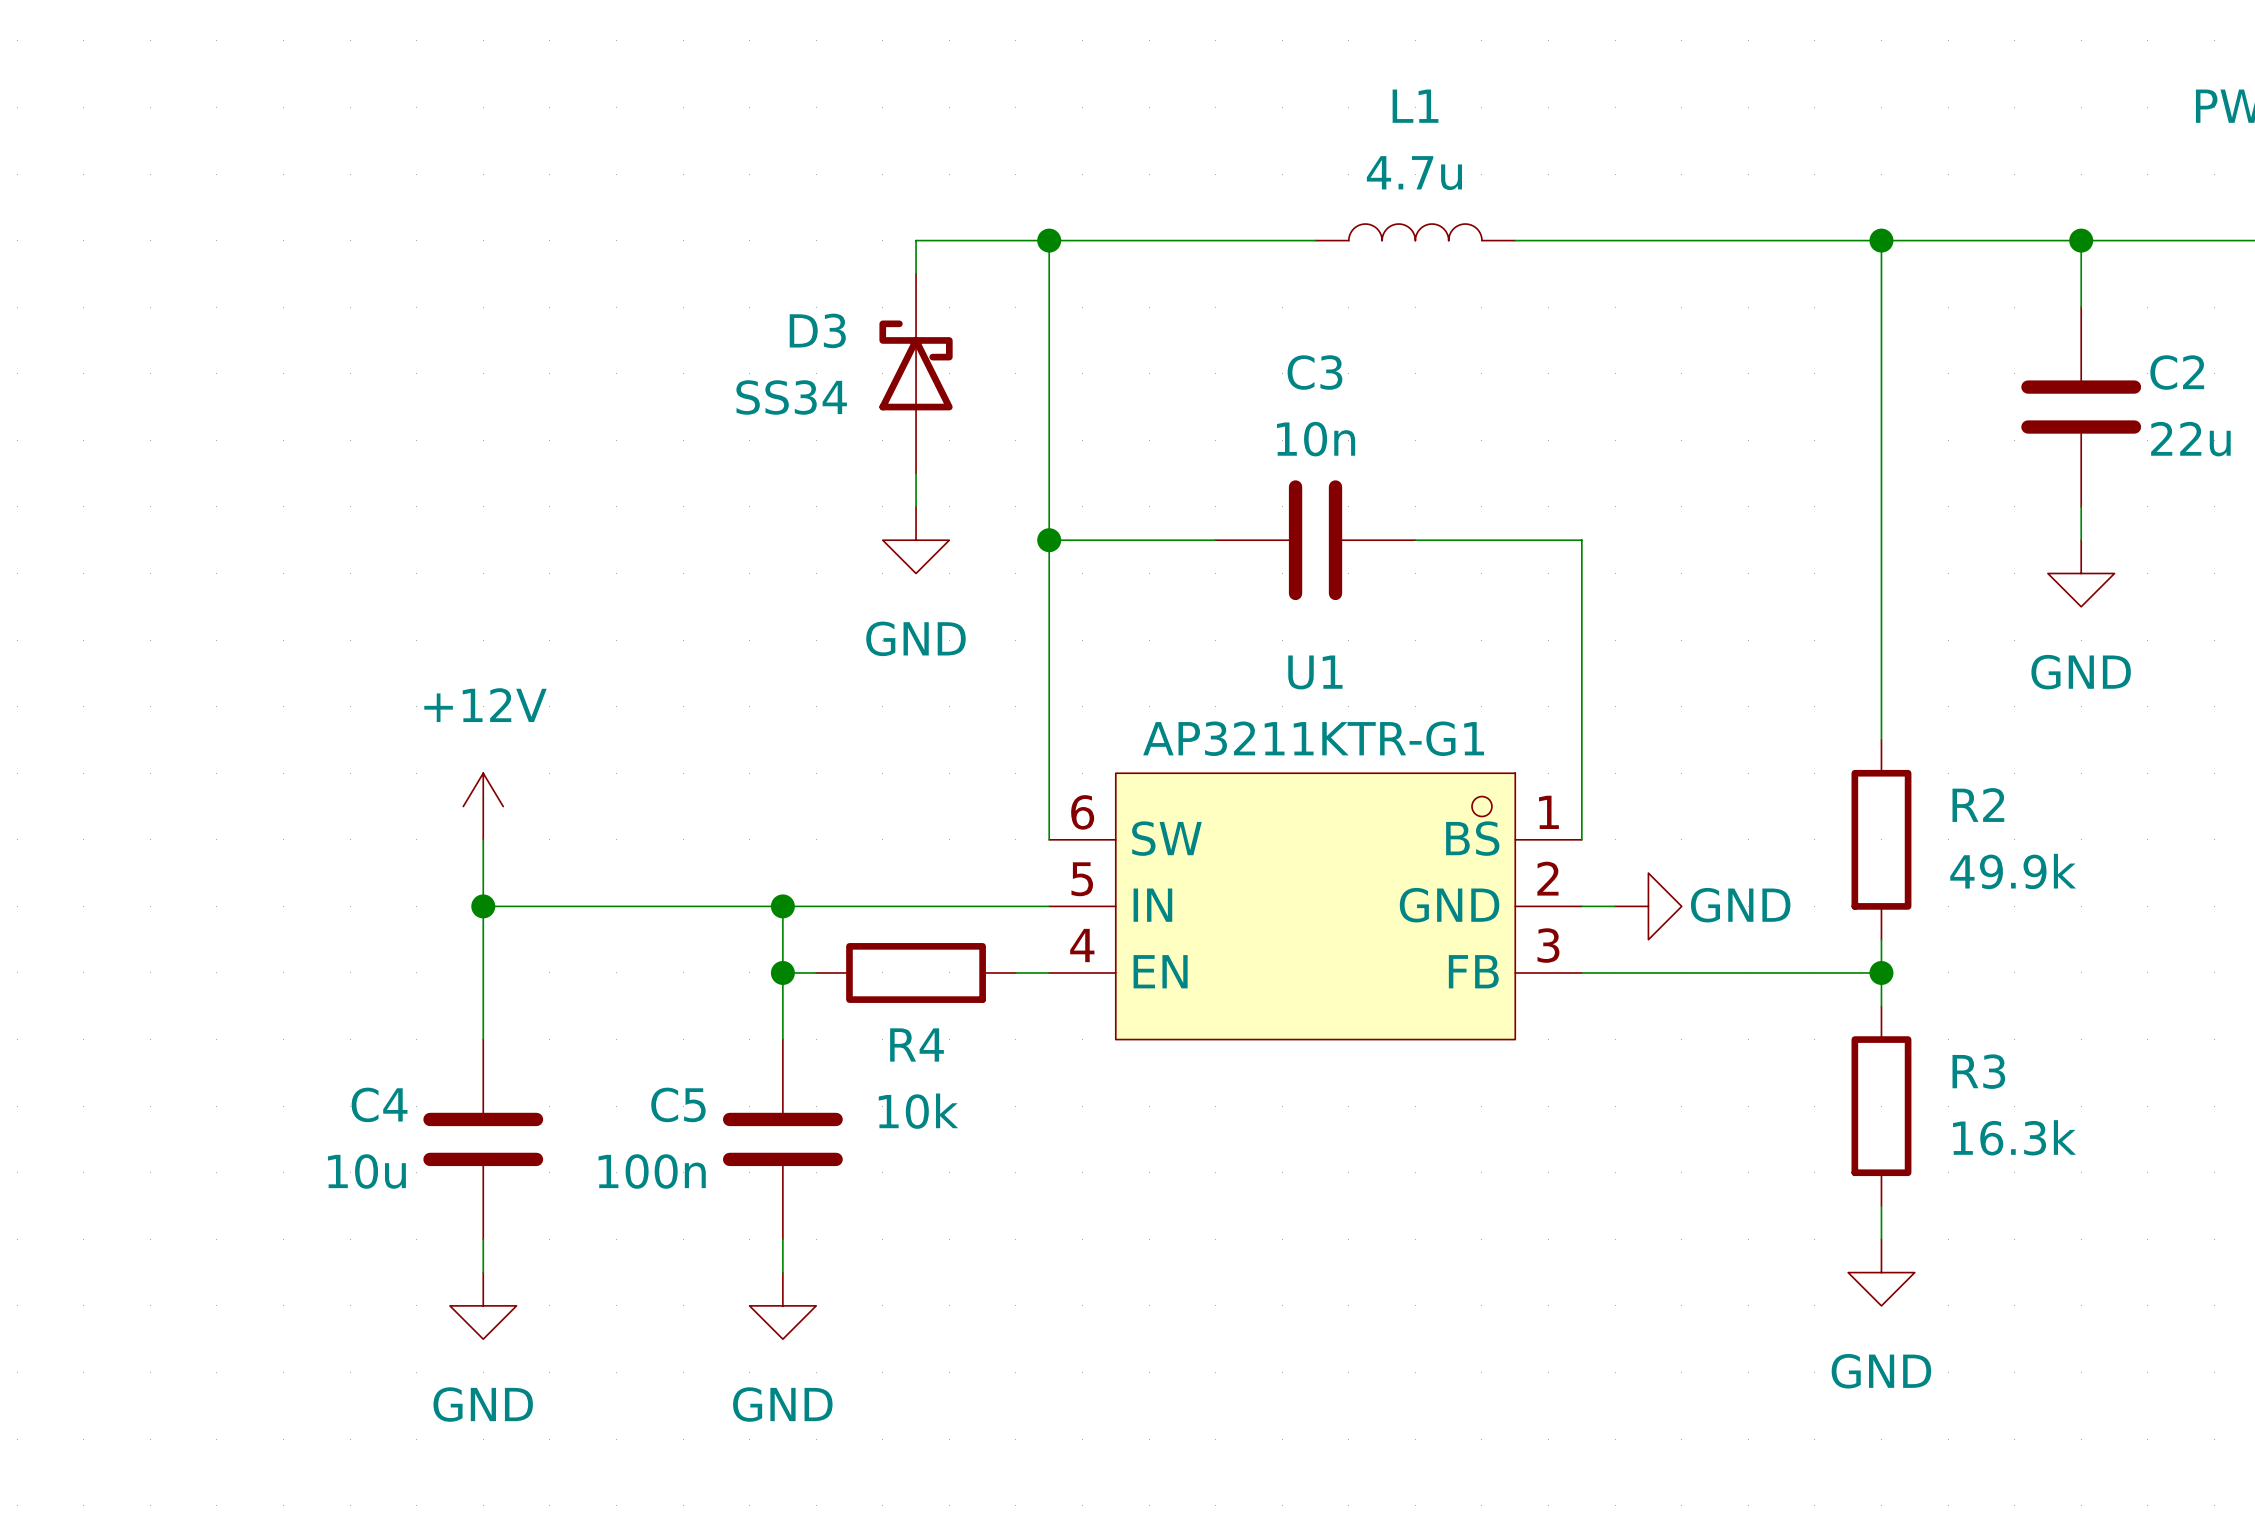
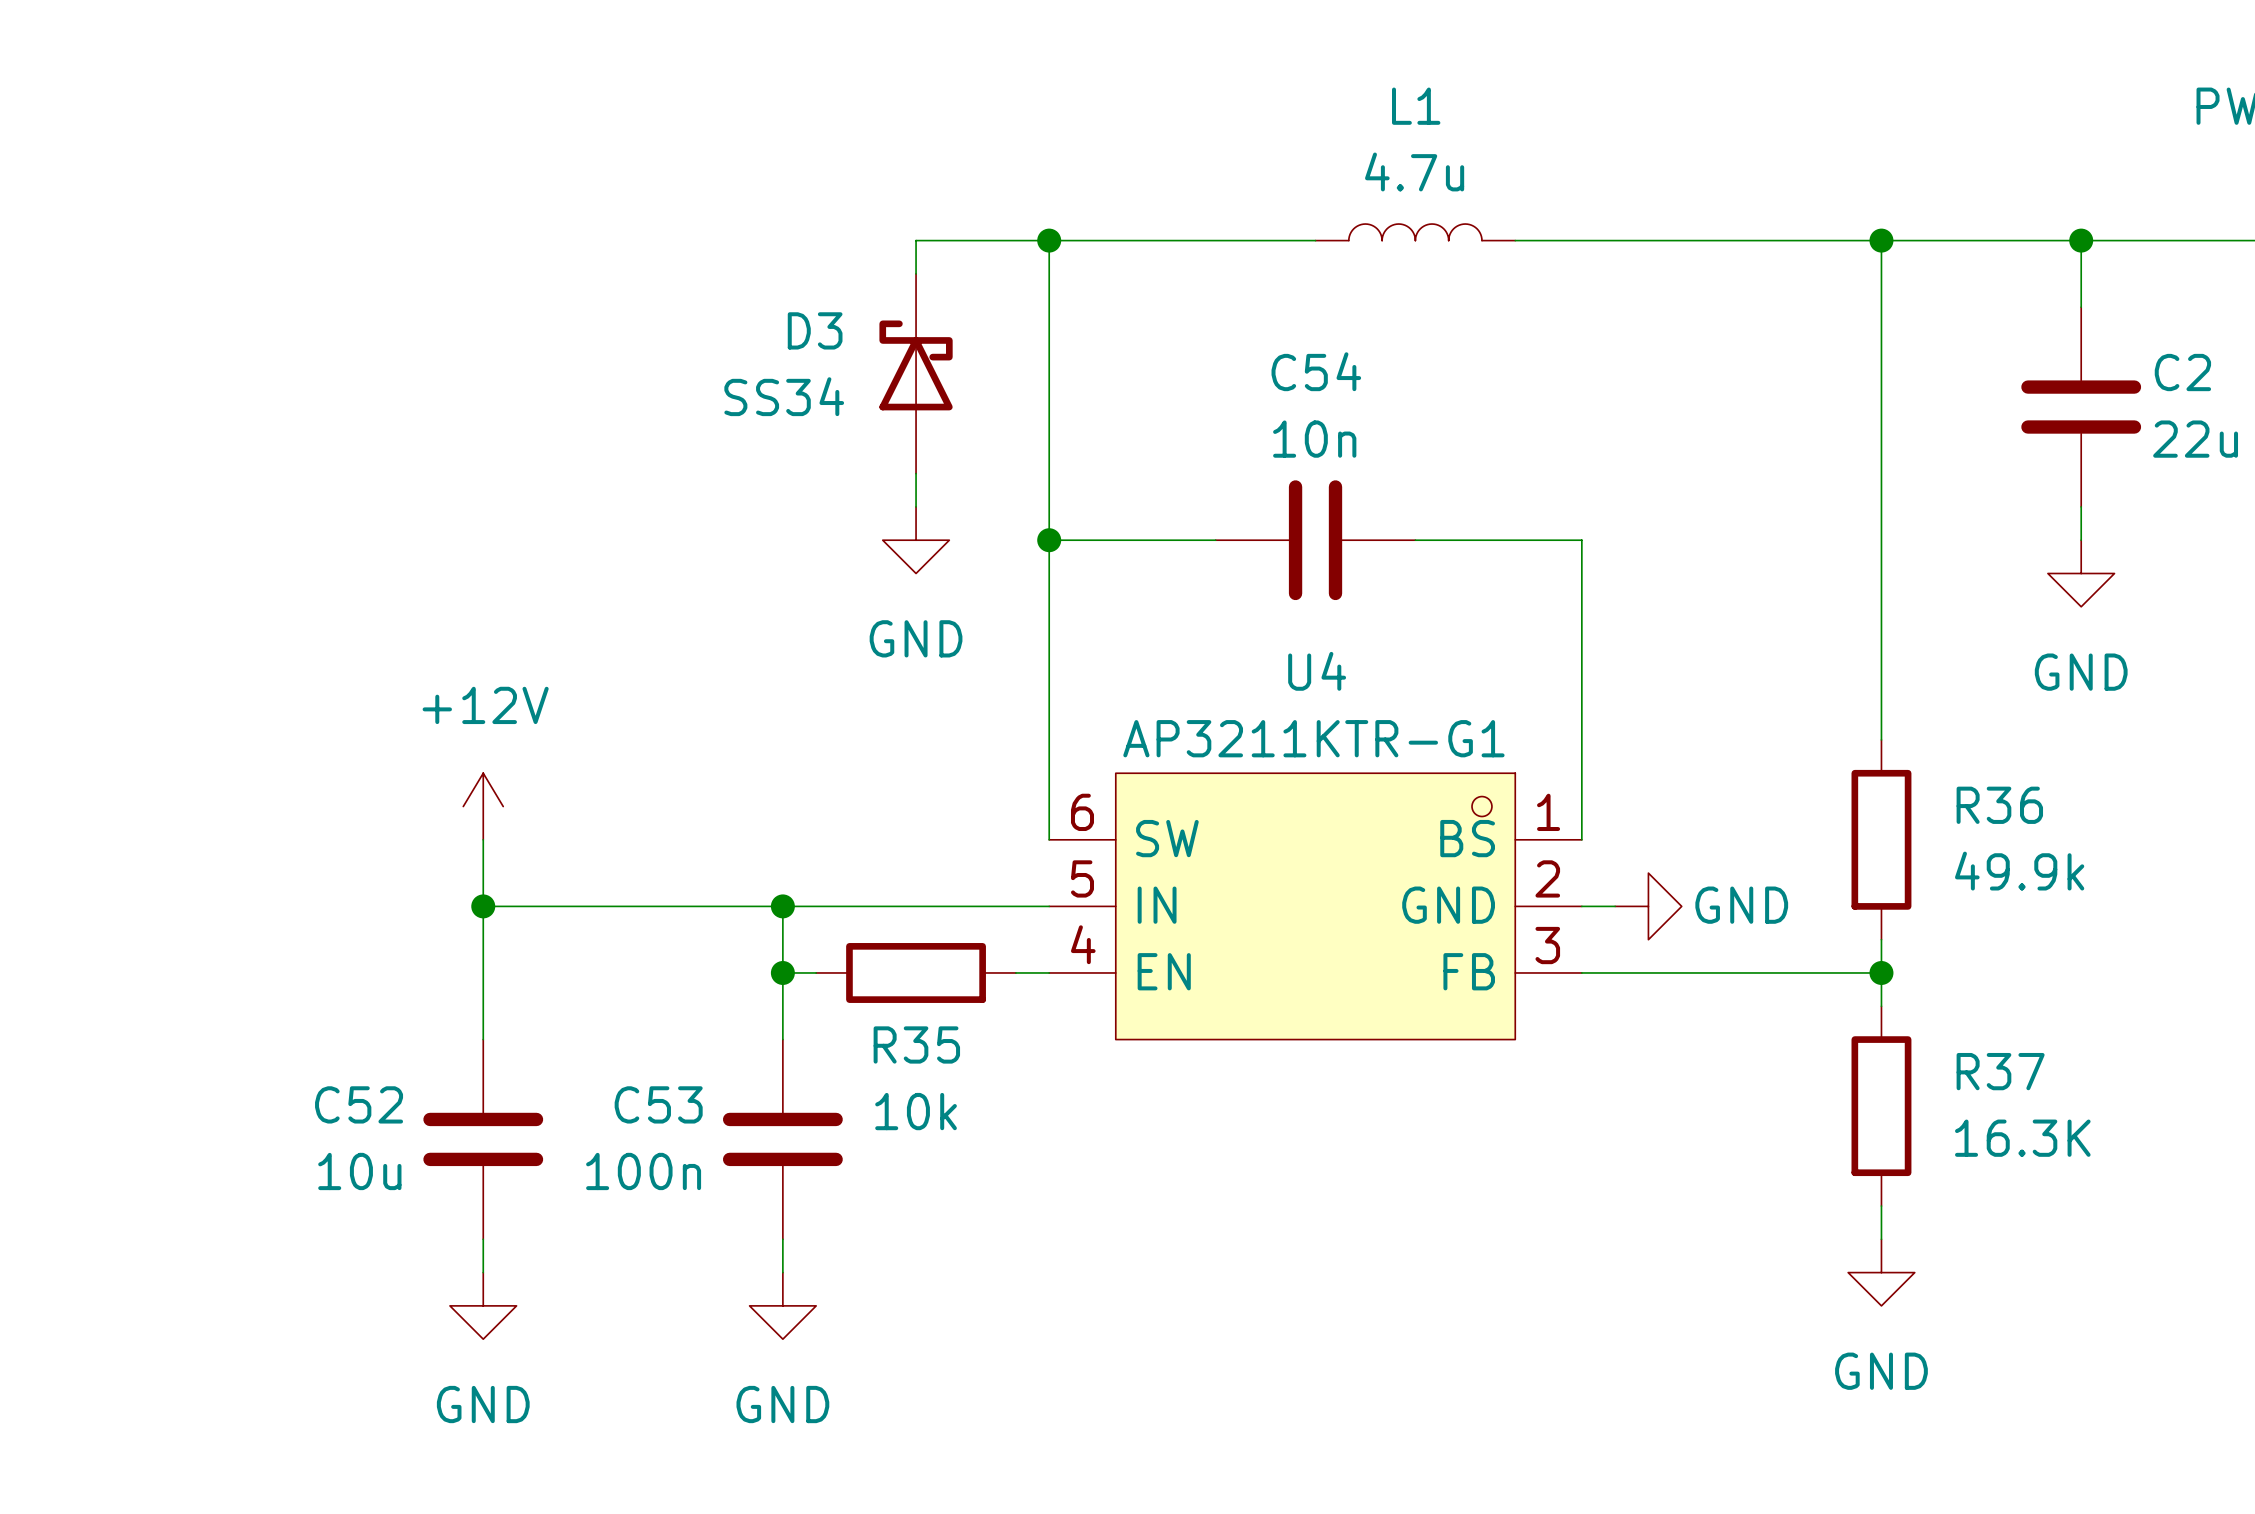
C3 name: C3 (1314, 372) -> C54 (1316, 371)
U1 name: U1 (1315, 672) -> U4 (1317, 671)
R2 name: R2 (1978, 804) -> R36 (1999, 805)
R4 name: R4 (917, 1044) -> R35 (916, 1044)
R3 name: R3 (1978, 1071) -> R37 (2000, 1071)
C4 name: C4 (379, 1104) -> C52 (359, 1104)
C5 name: C5 (678, 1104) -> C53 (658, 1104)
R3 value: 16.3k (2014, 1137) -> 16.3K (2022, 1138)

